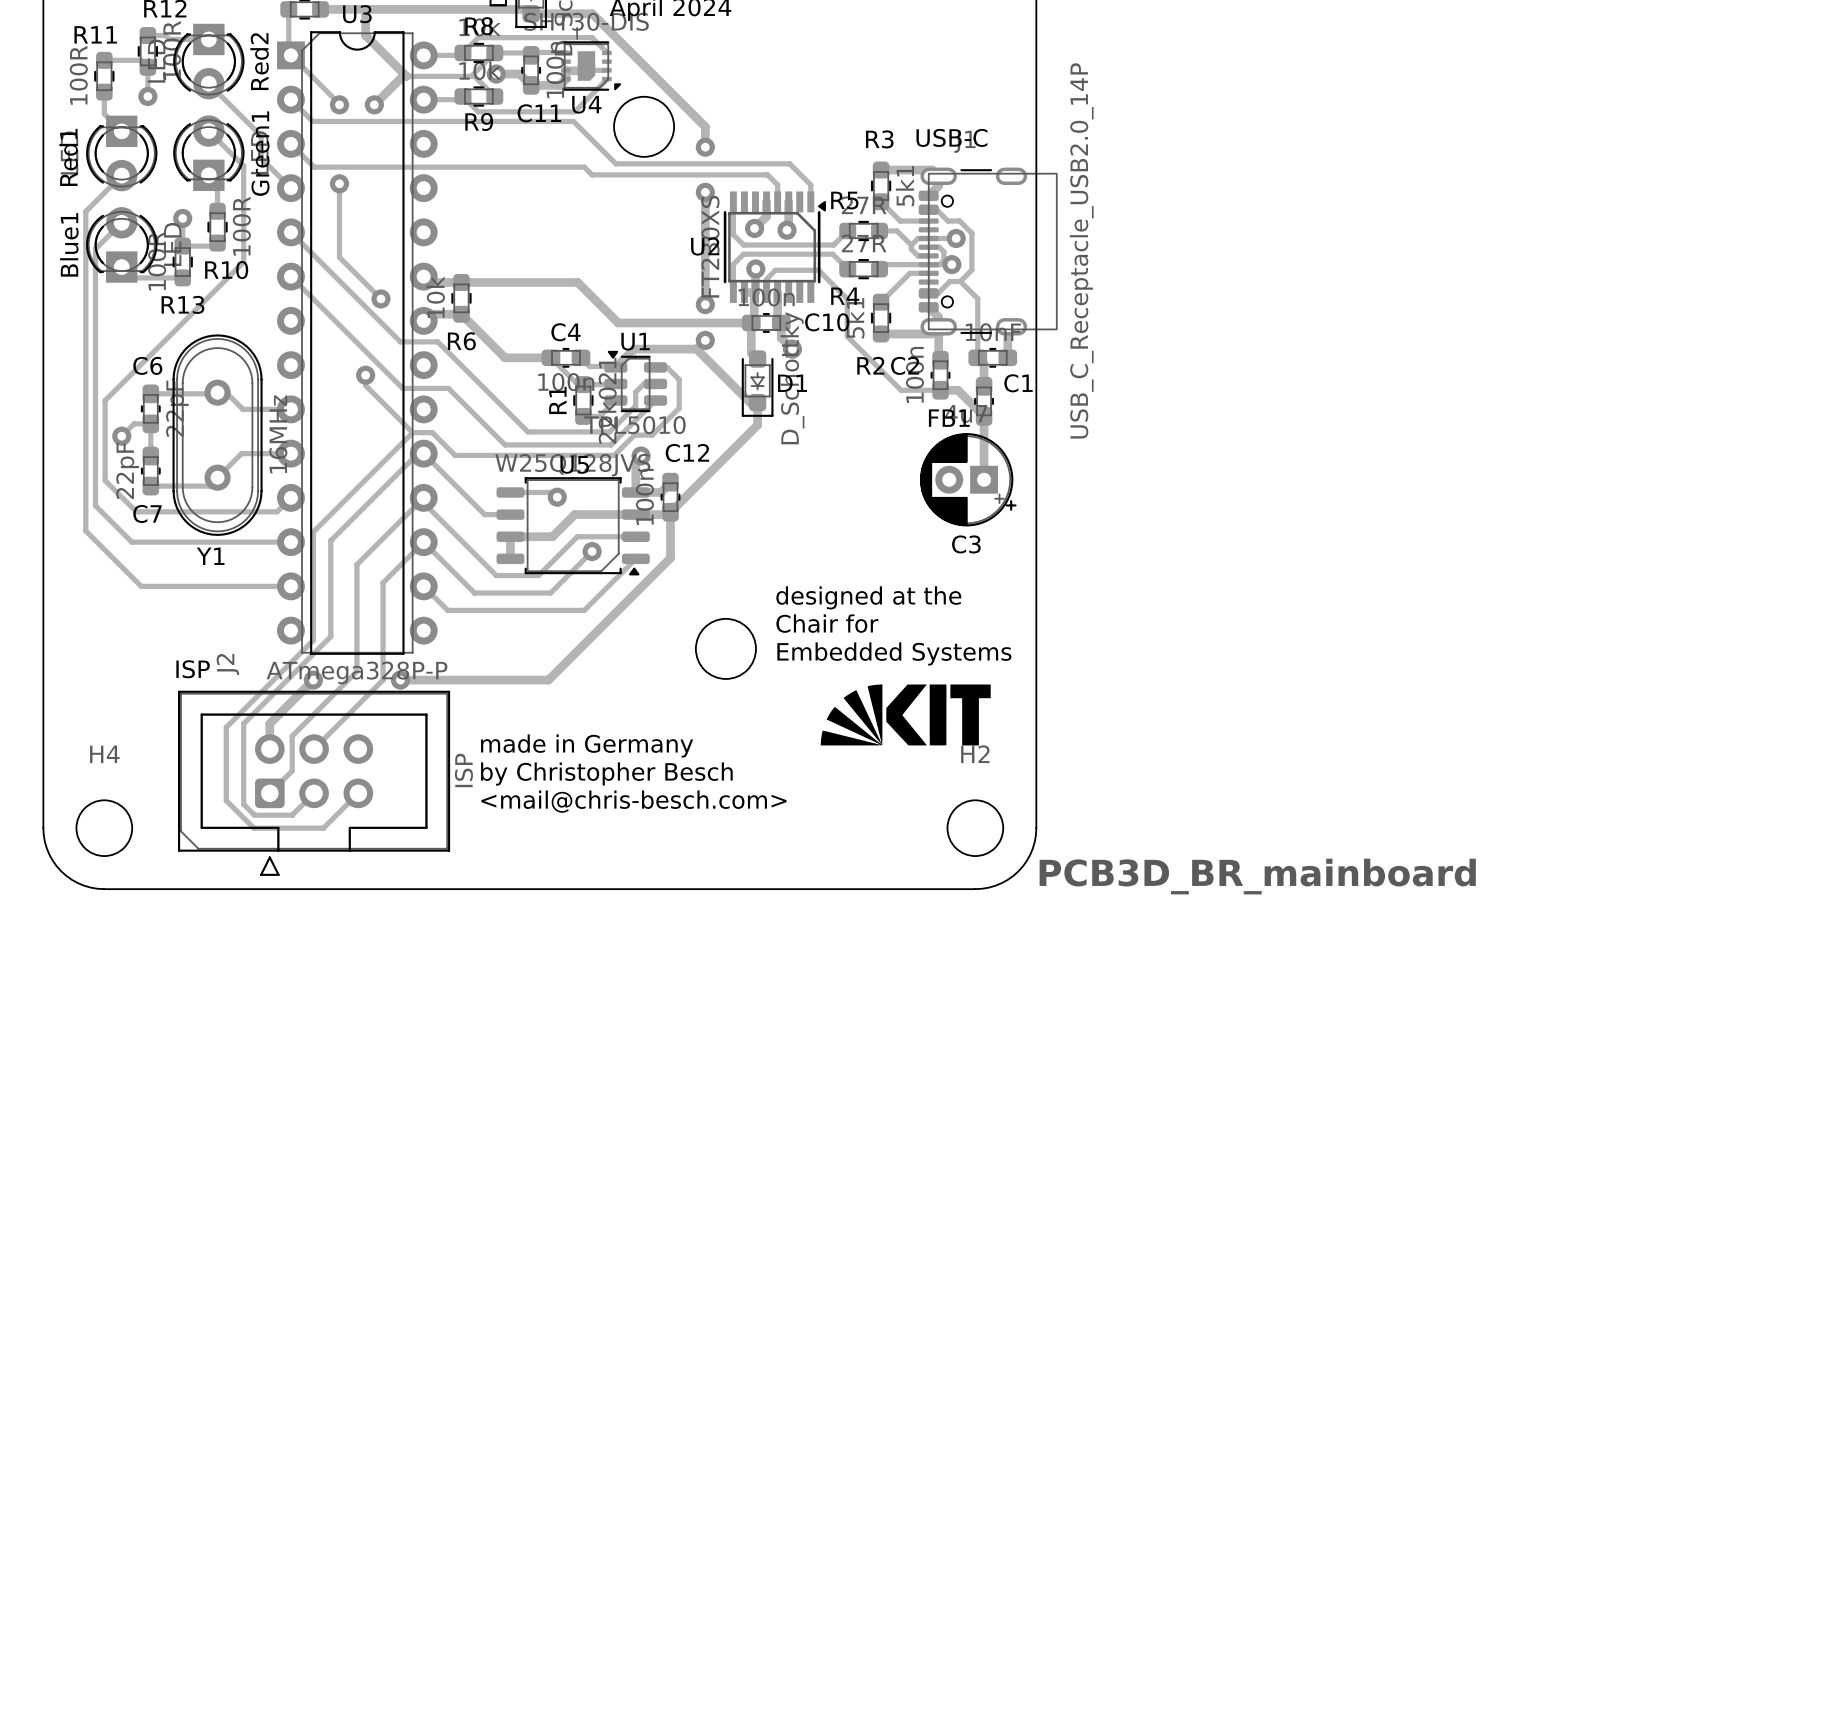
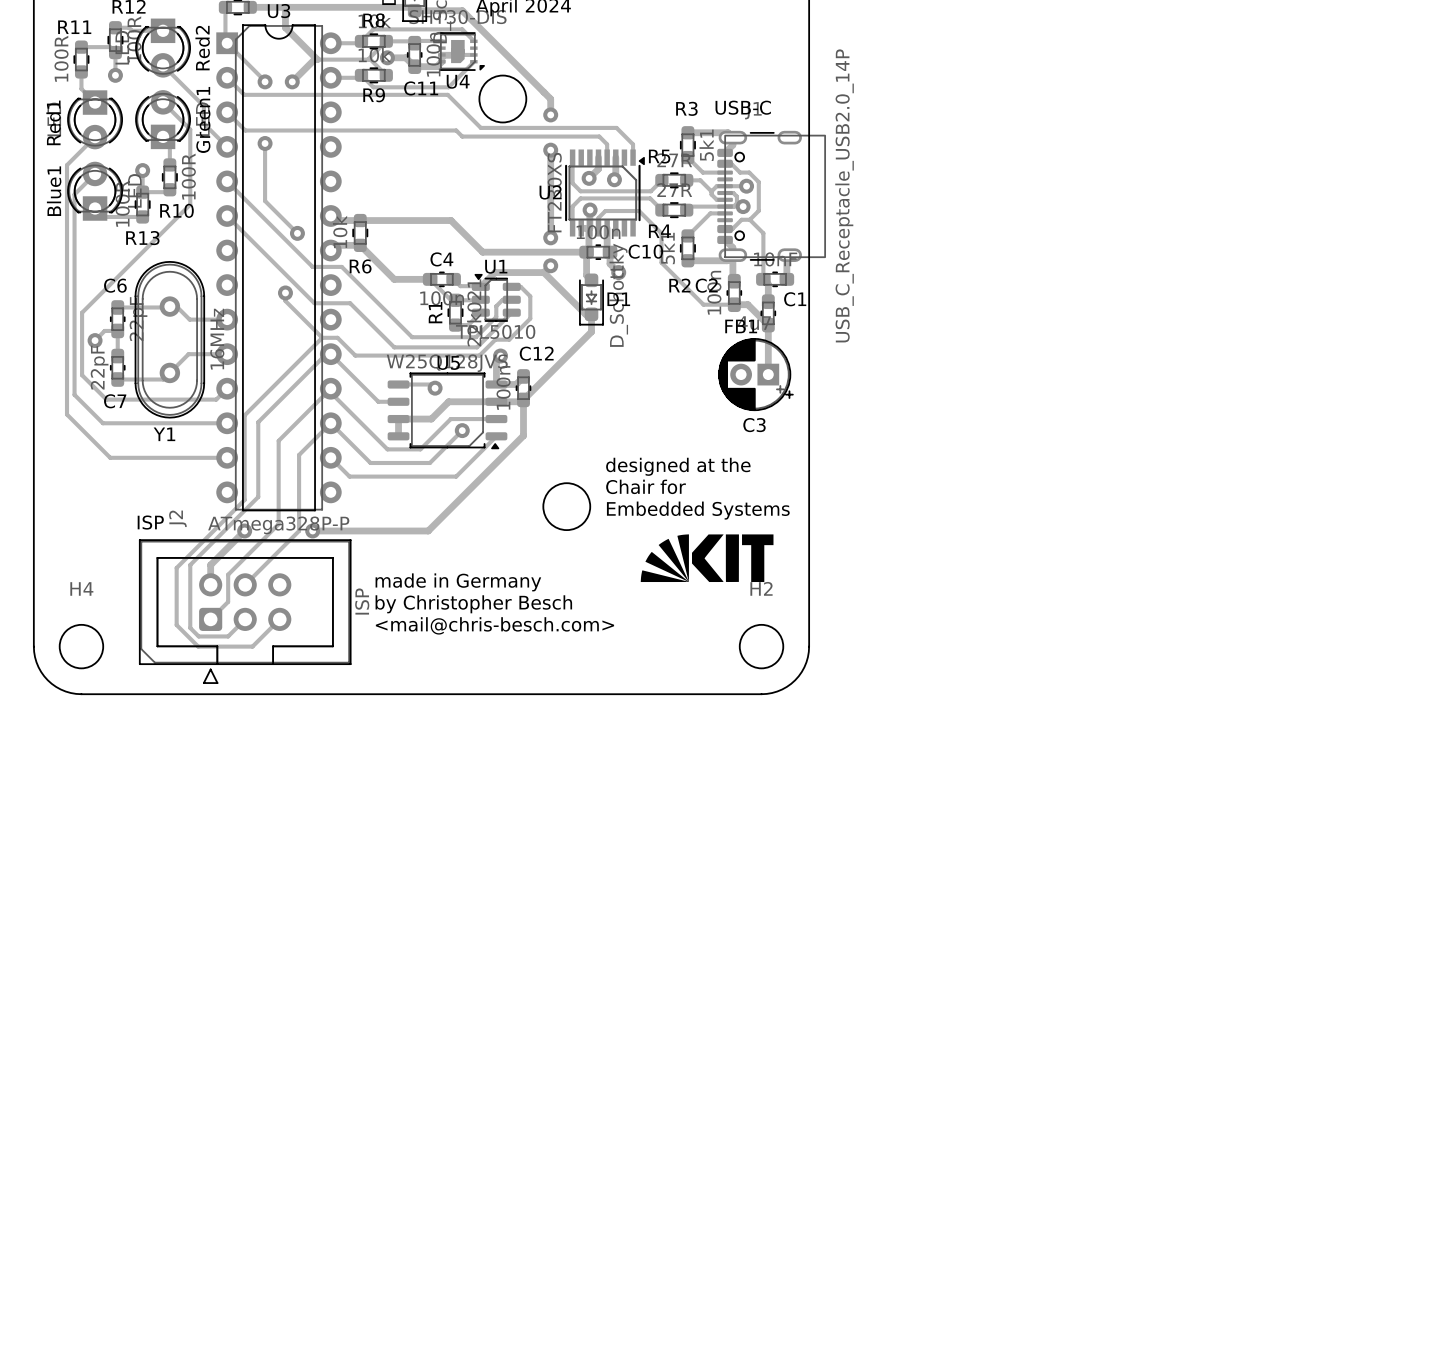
text: PCB3D_BR_mainboard (1257, 876) -> none

